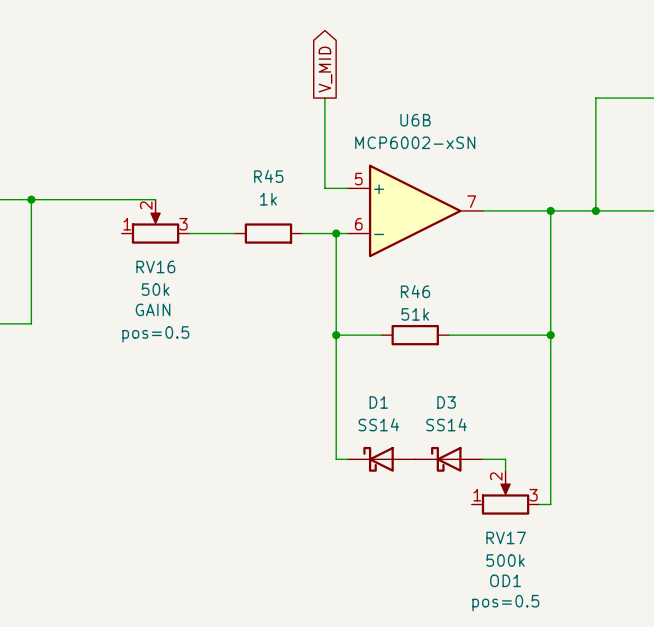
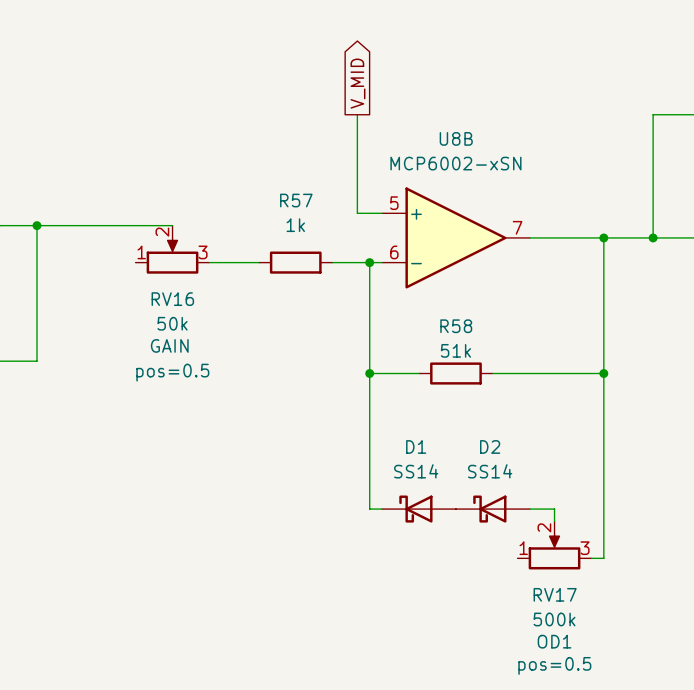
U6B name: U6B (415, 120) -> U8B (456, 138)
R45 name: R45 (268, 176) -> R57 (296, 200)
R46 name: R46 (415, 291) -> R58 (456, 326)
D3 name: D3 (446, 402) -> D2 (490, 446)

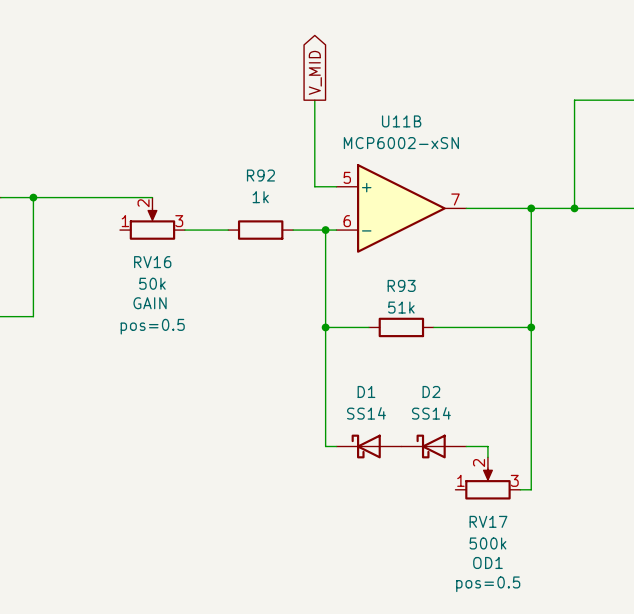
U8B name: U8B (456, 138) -> U11B (401, 121)
R57 name: R57 (296, 200) -> R92 (260, 175)
R58 name: R58 (456, 326) -> R93 (401, 285)

